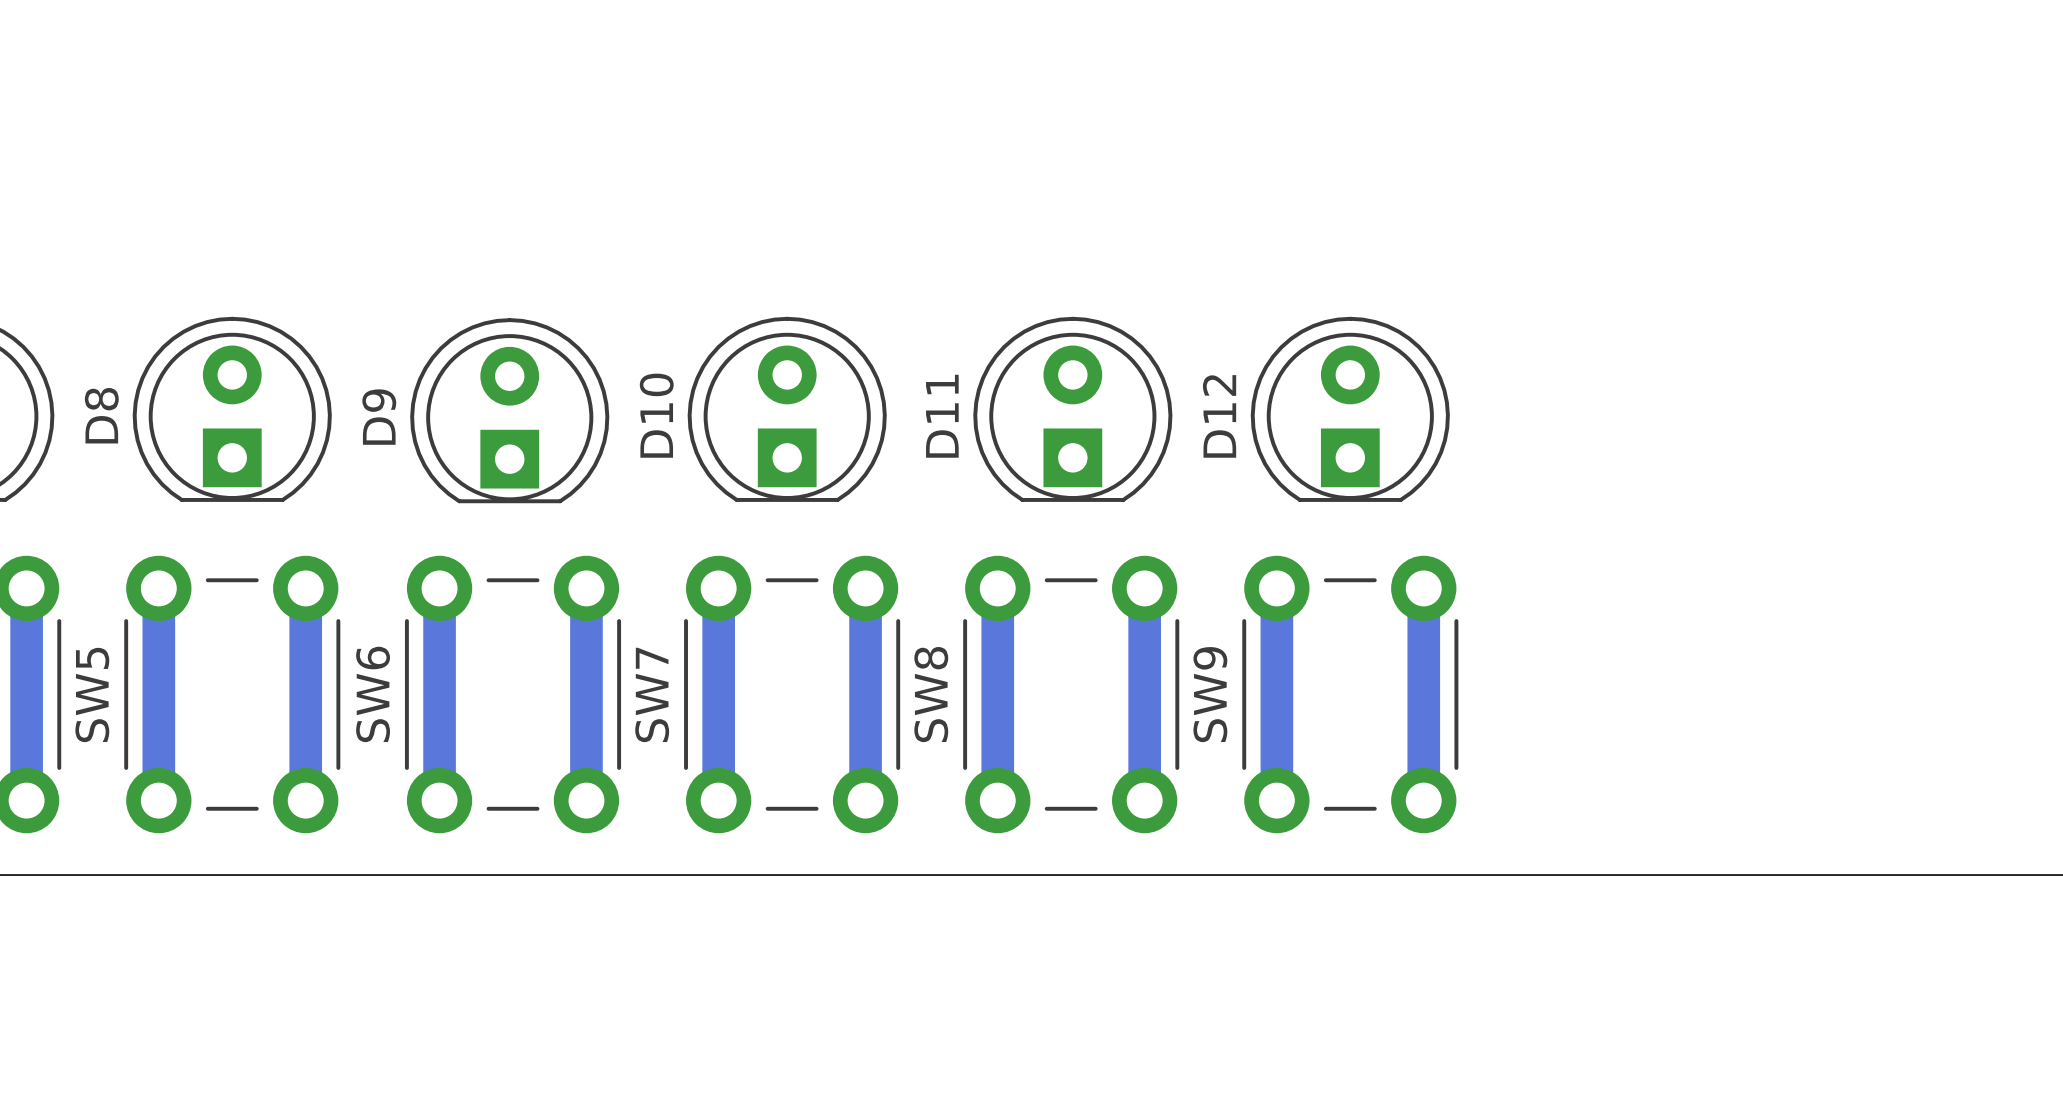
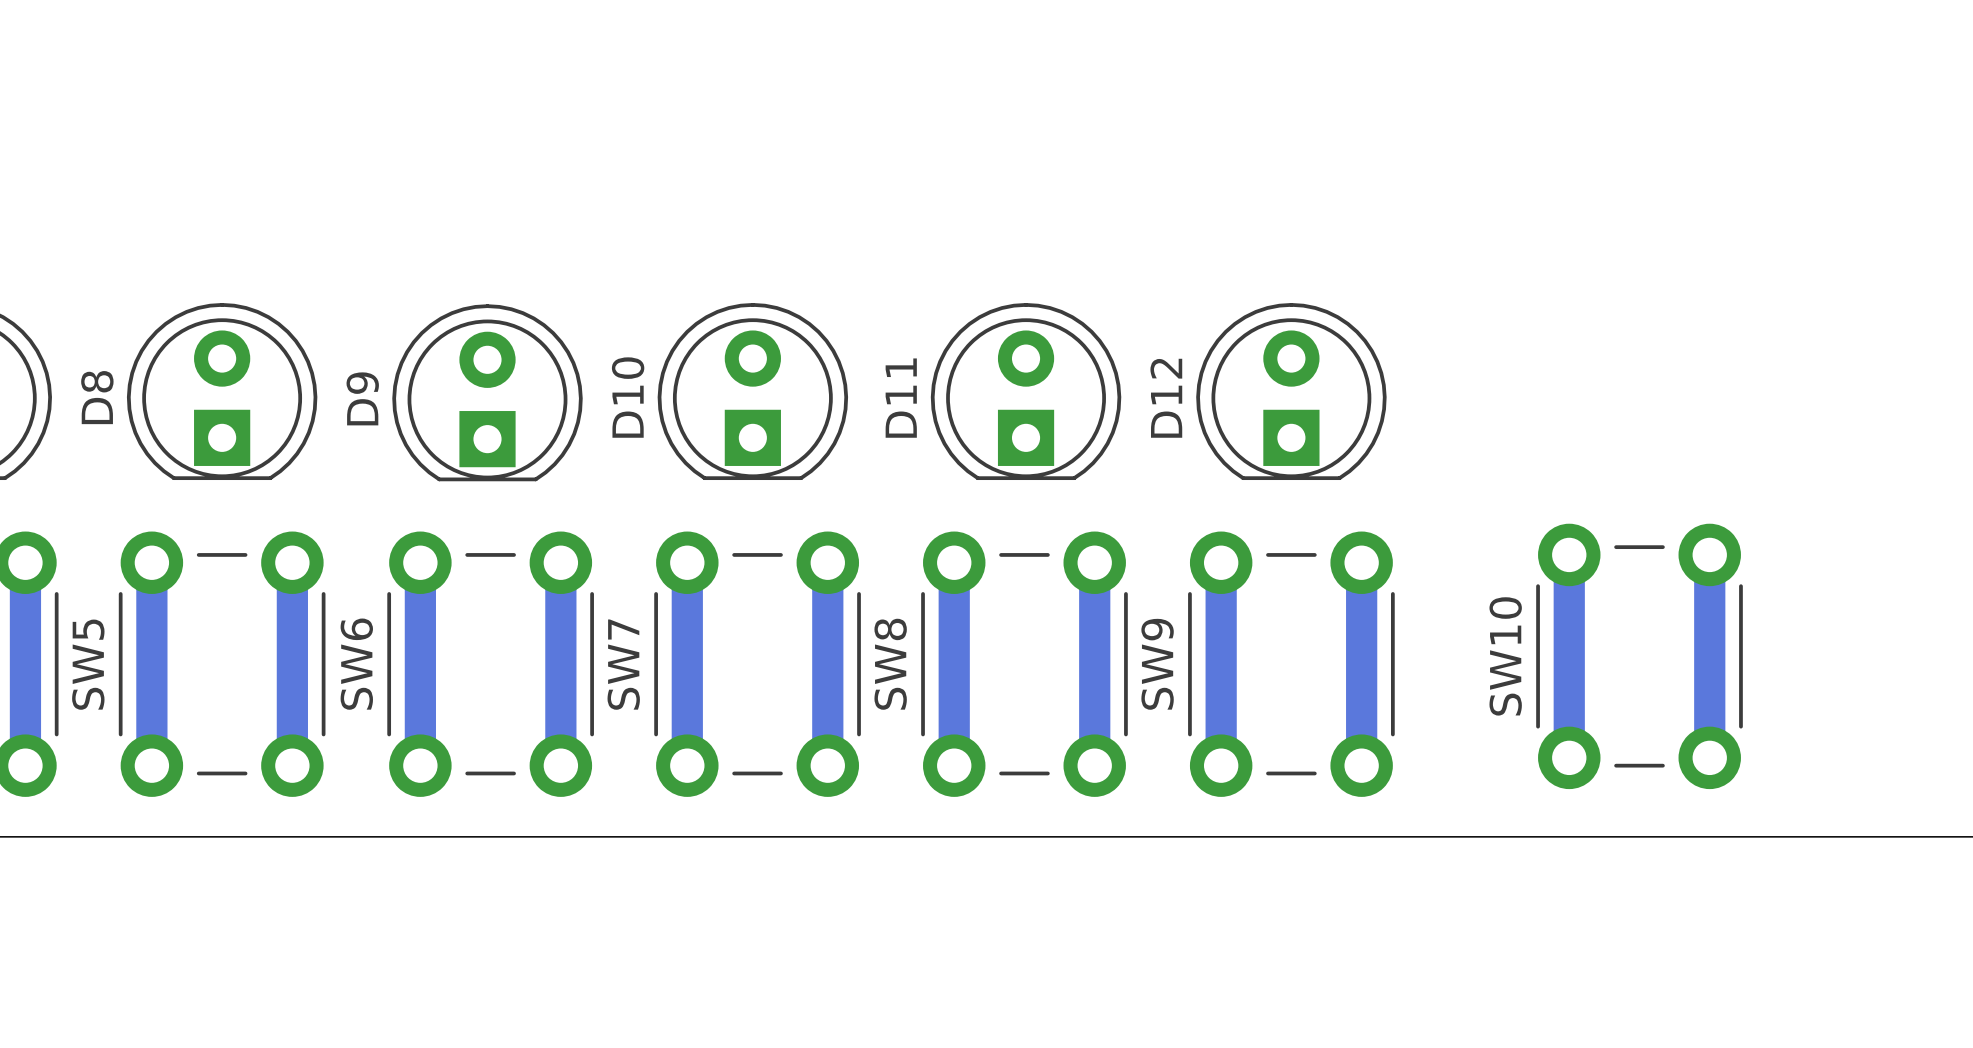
bottom track: none -> (1569, 554) (1569, 757)
bottom track: none -> (1709, 554) (1709, 757)
SW10: none -> (1639, 656)

